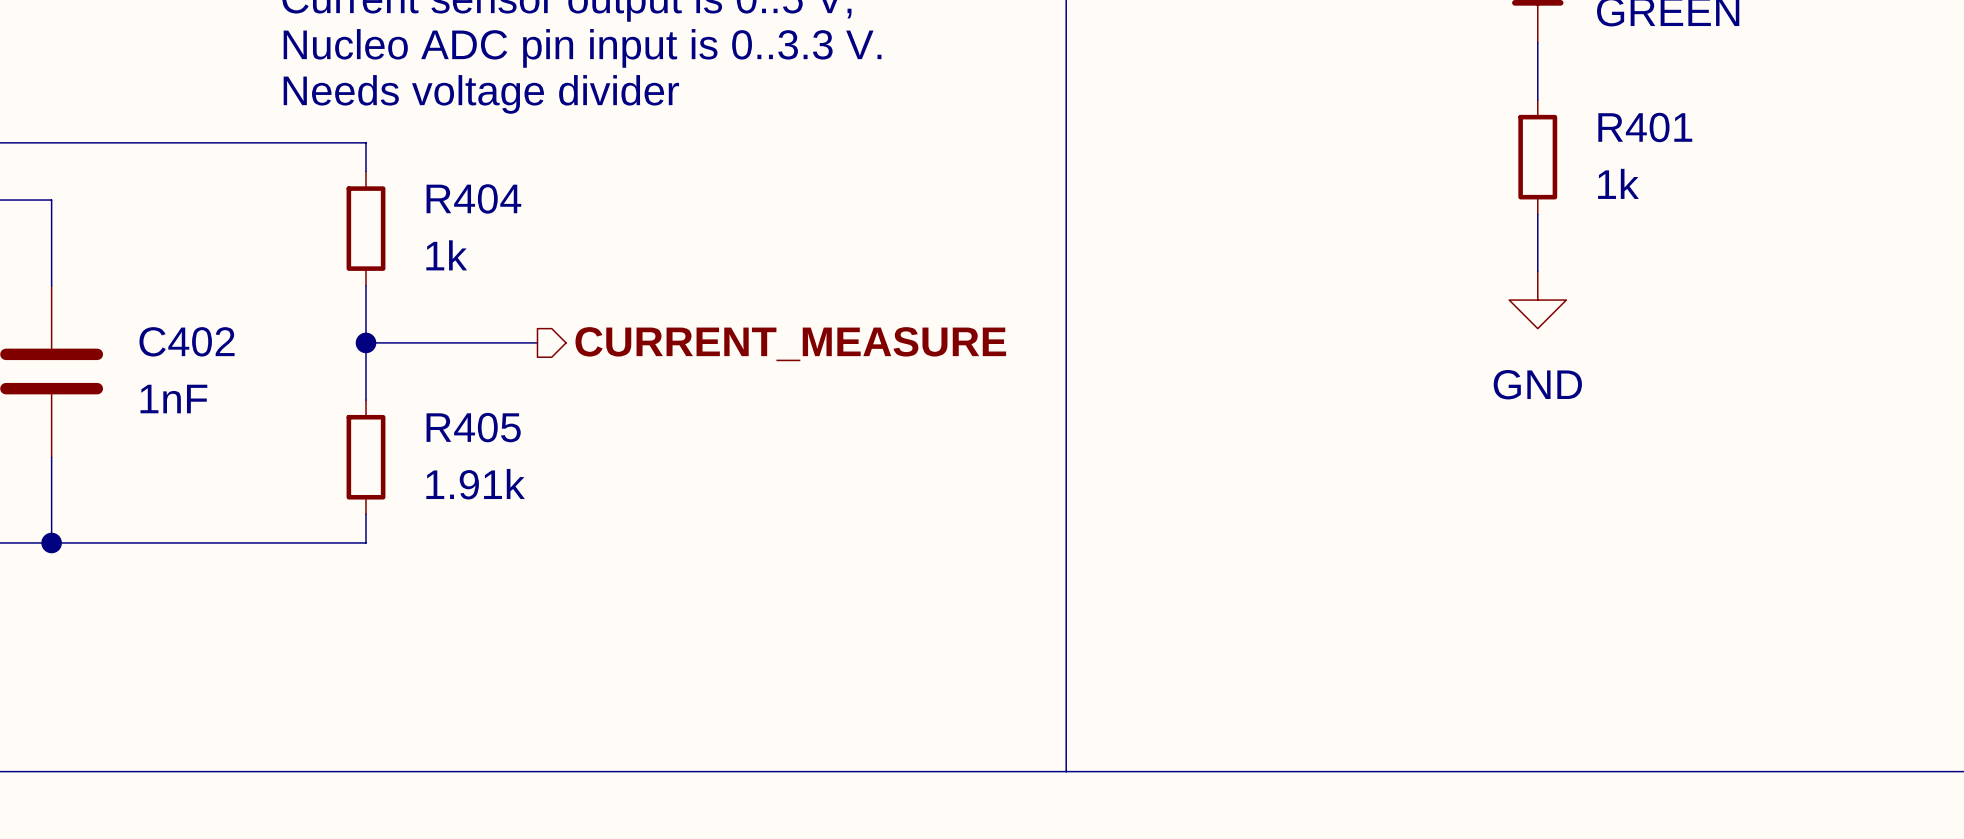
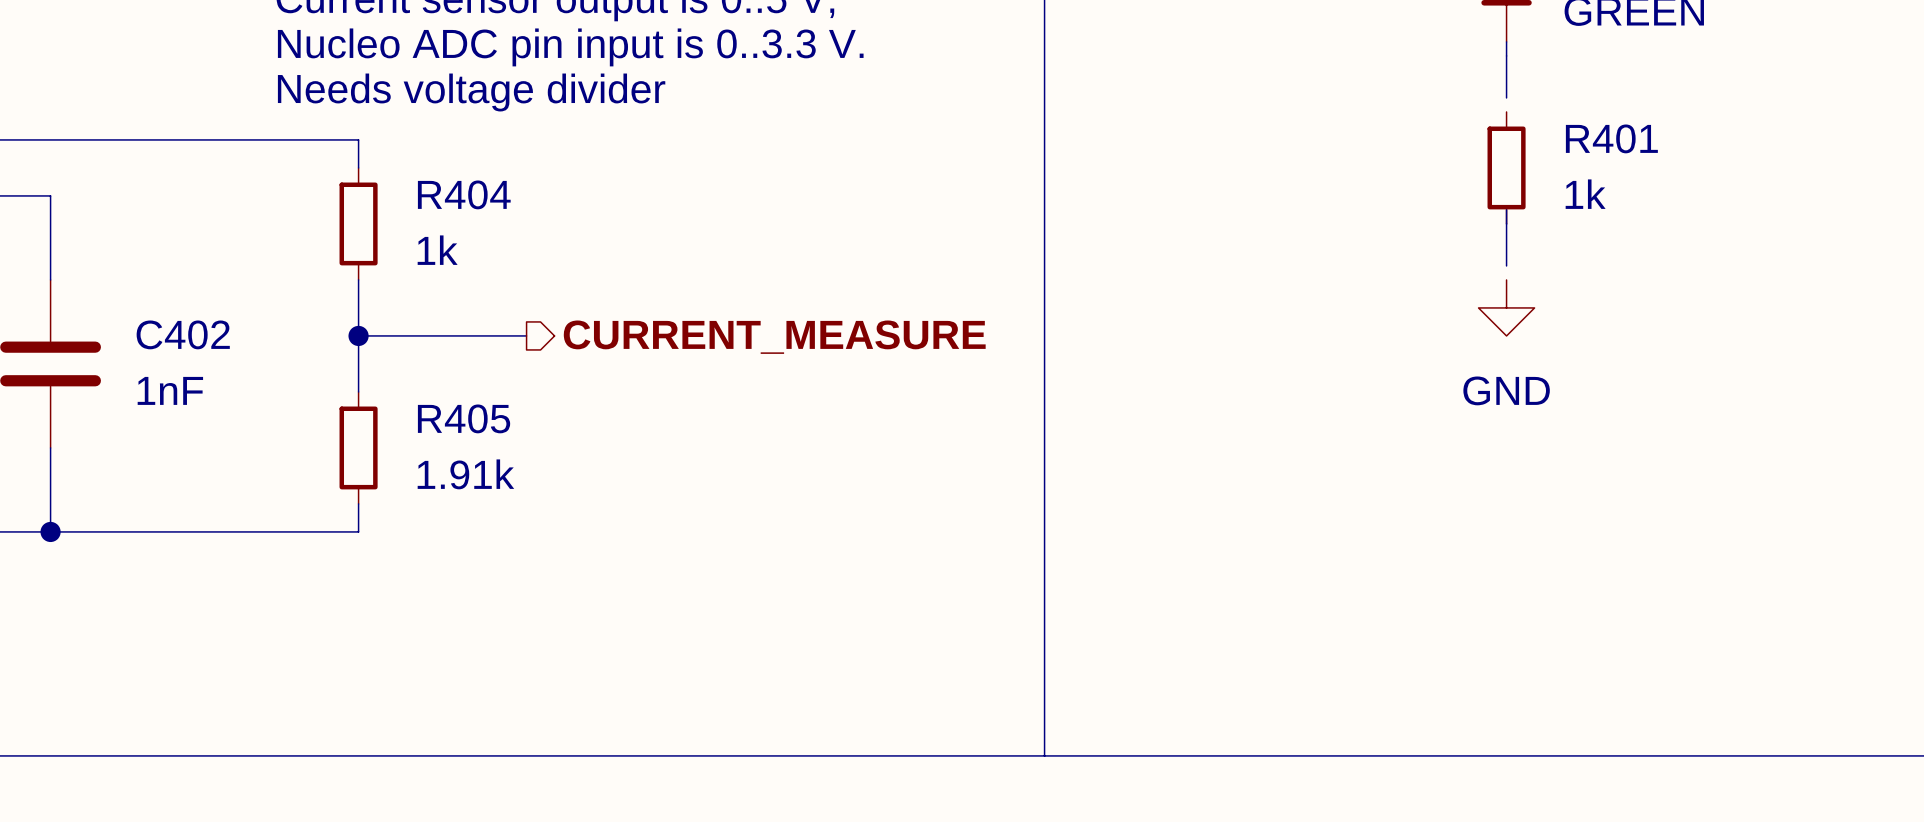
R401 position: (1537, 157) -> (1506, 167)
power symbol position: GND (1537, 300) -> GND (1506, 307)

